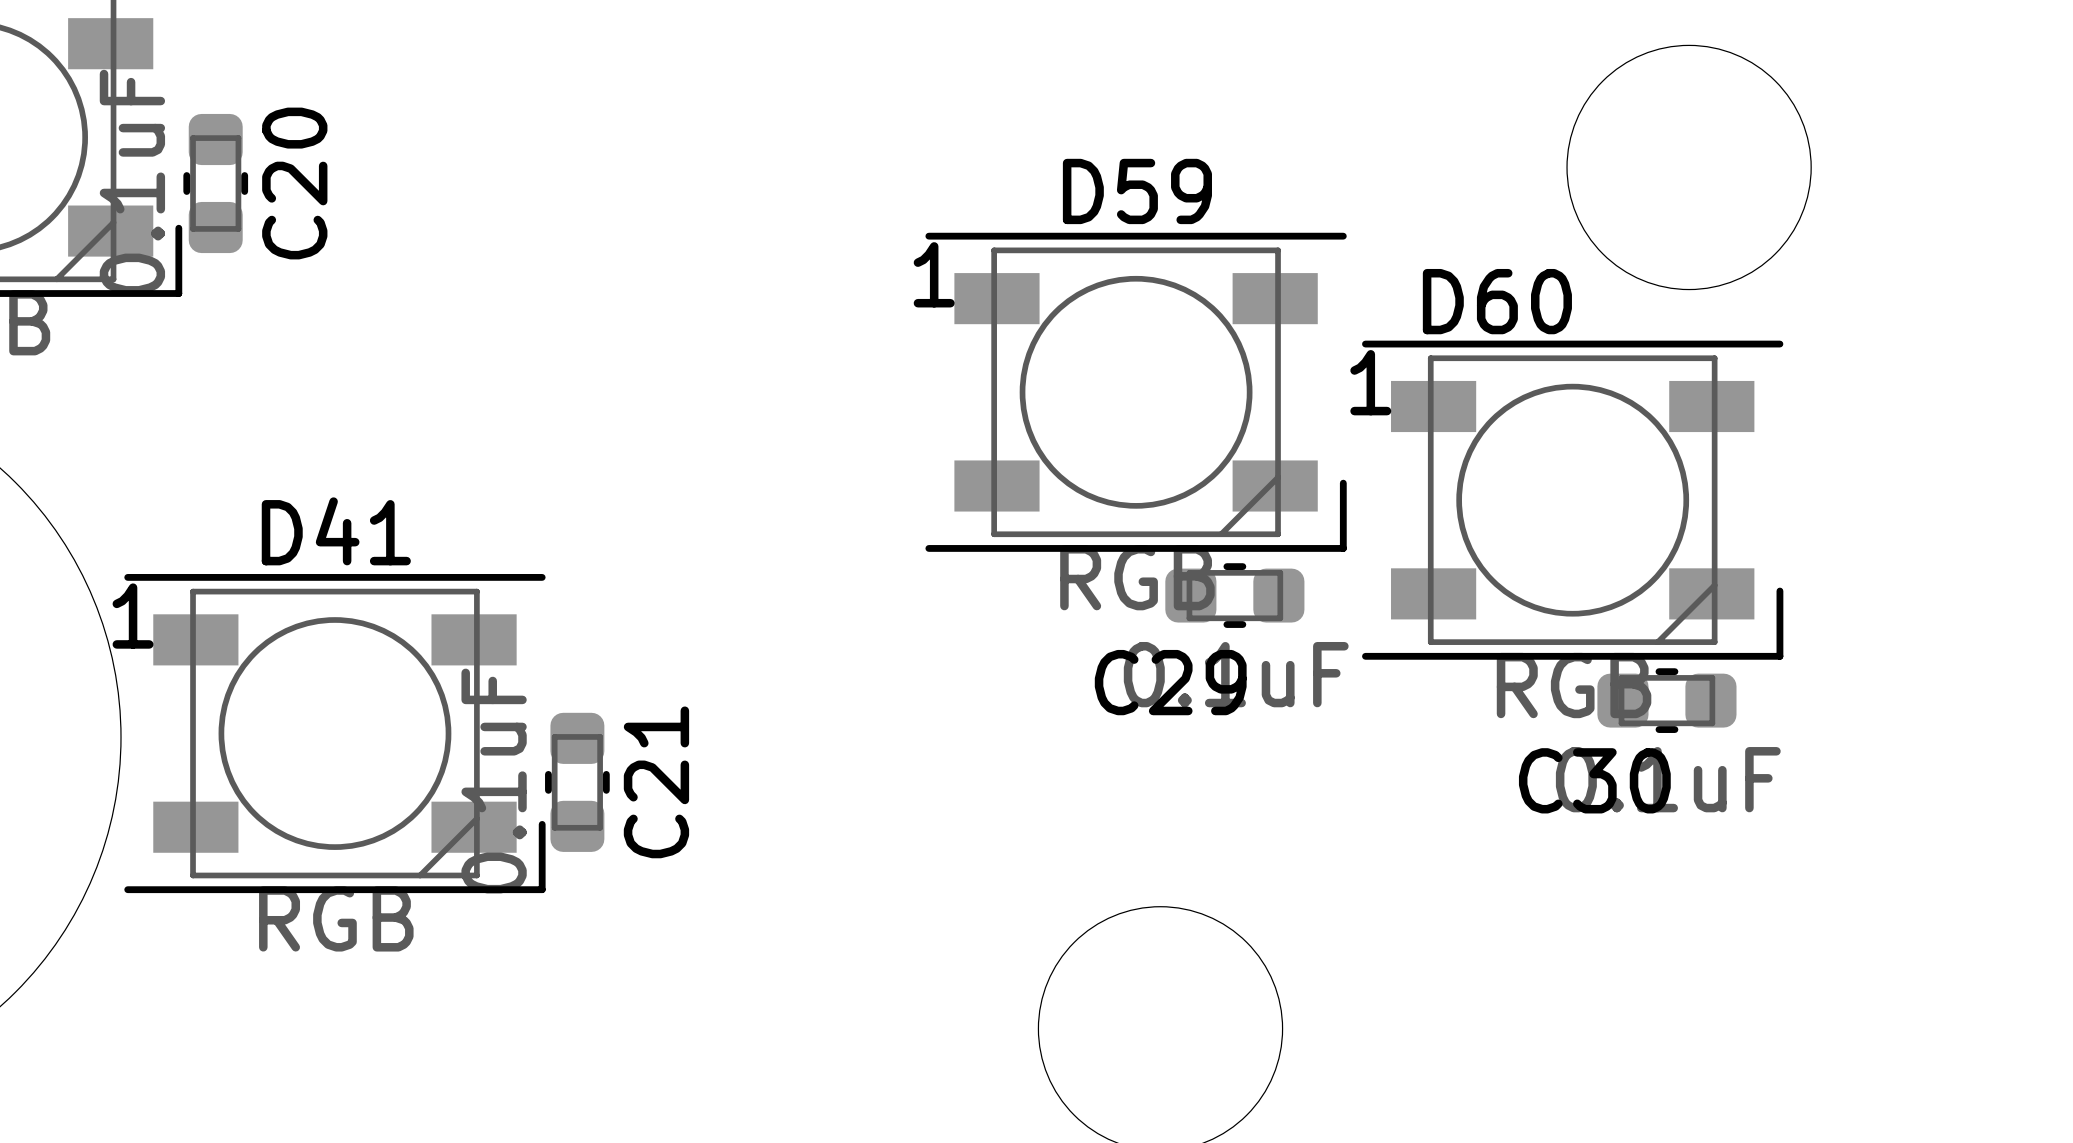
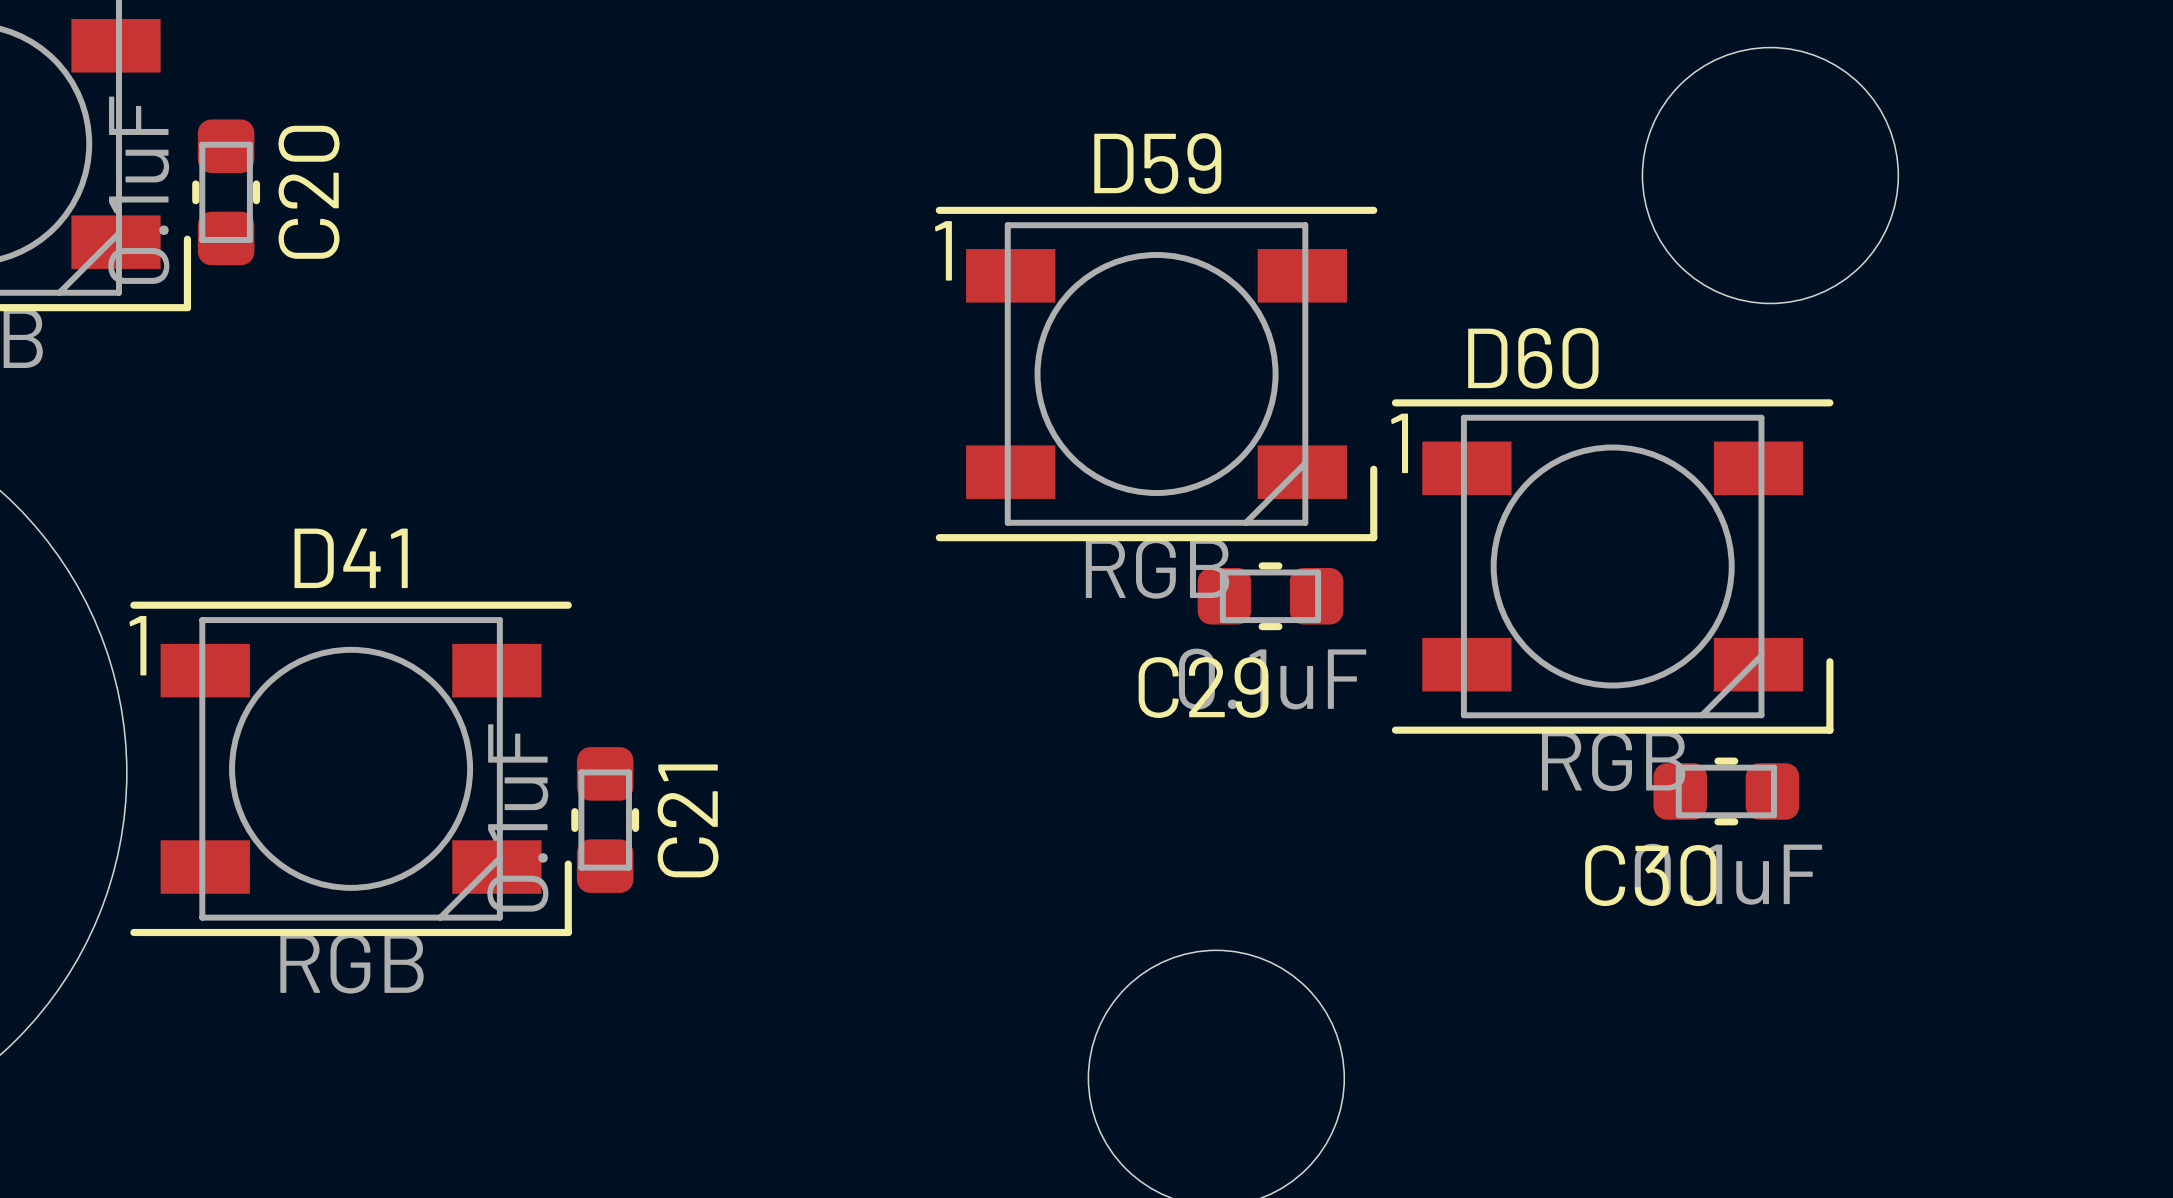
D59 position: (1136, 392) -> (1156, 374)
D60 position: (1572, 500) -> (1612, 566)
C29 position: (1234, 595) -> (1270, 596)
C30 position: (1666, 700) -> (1726, 791)

